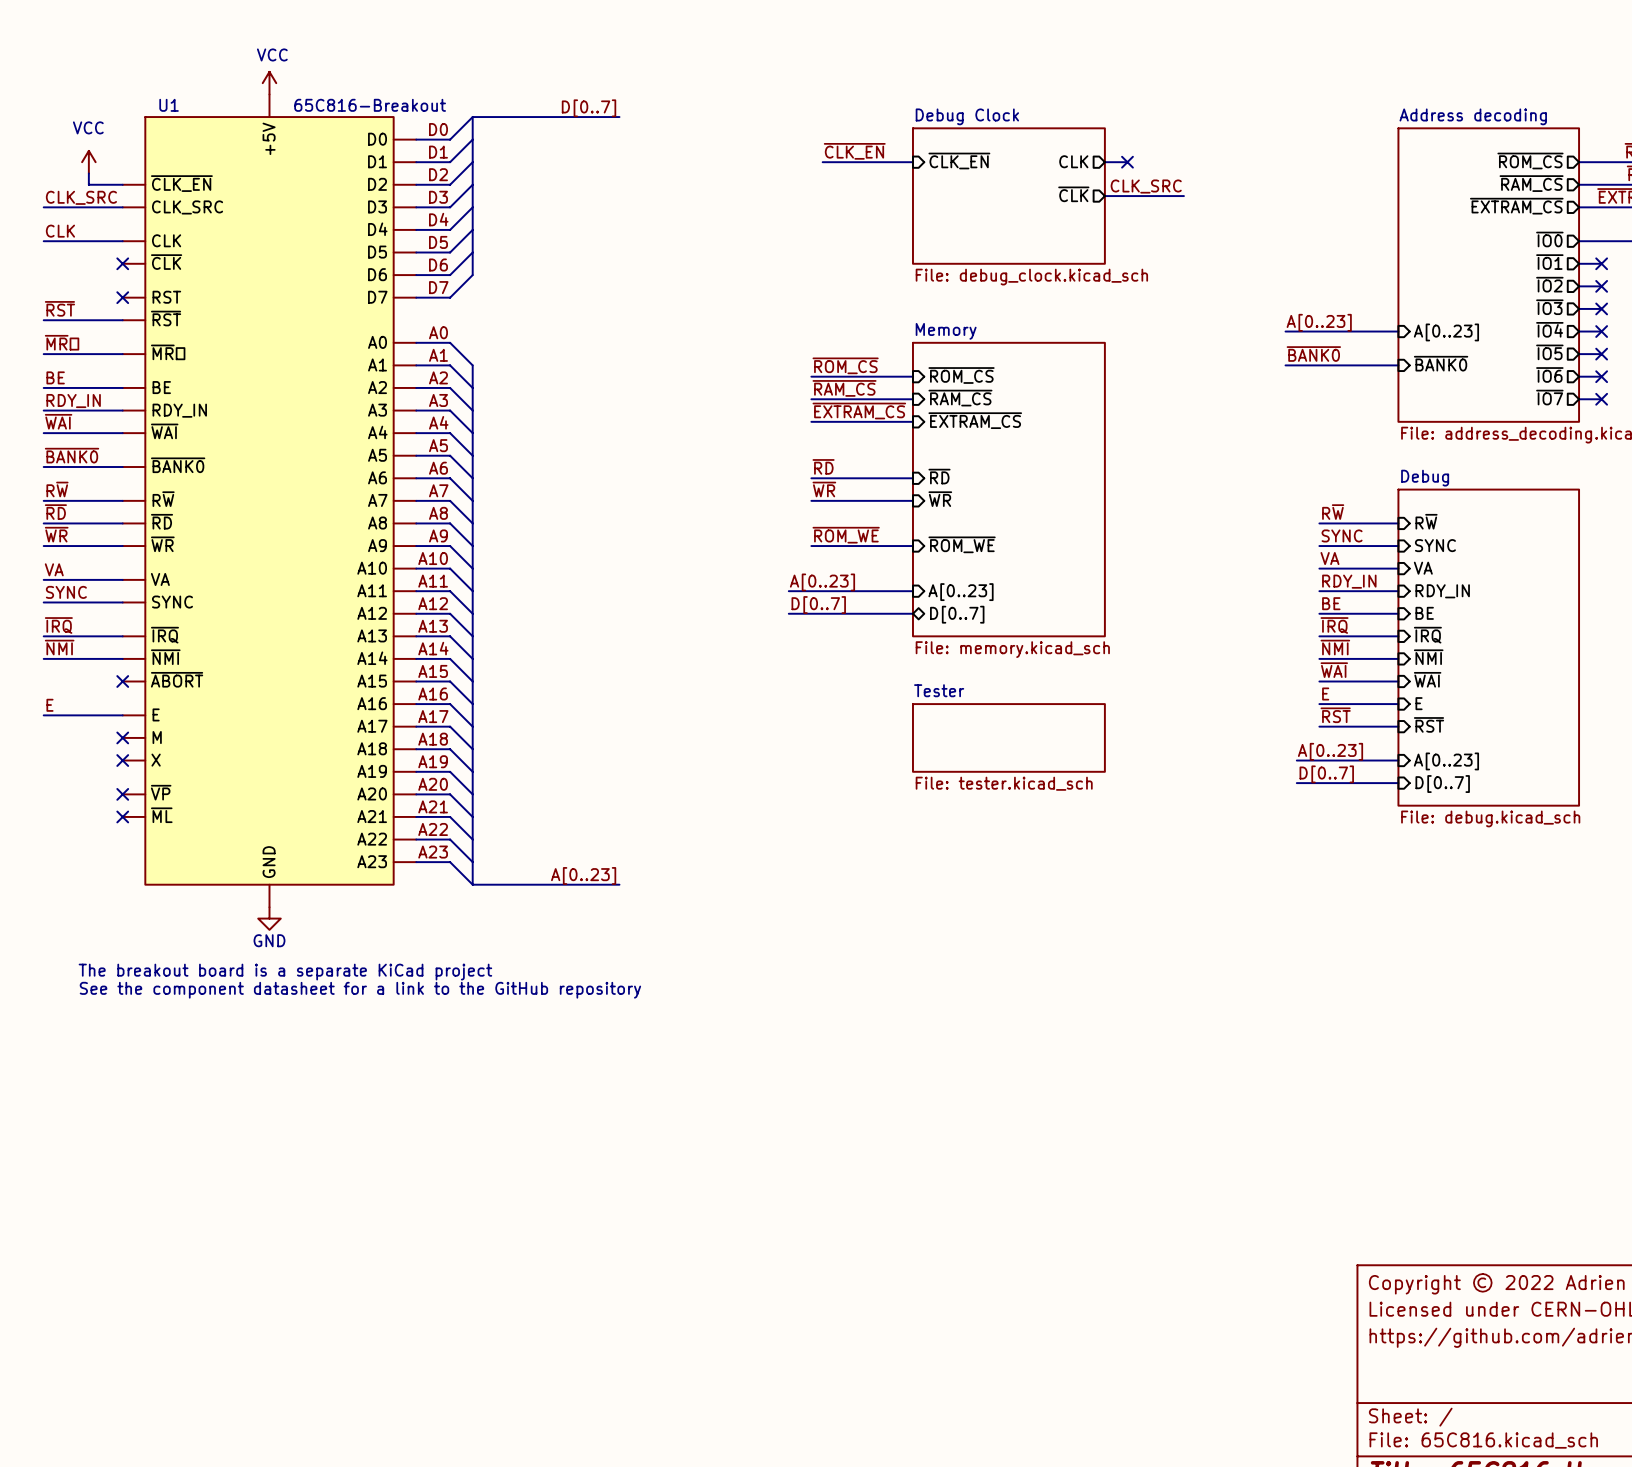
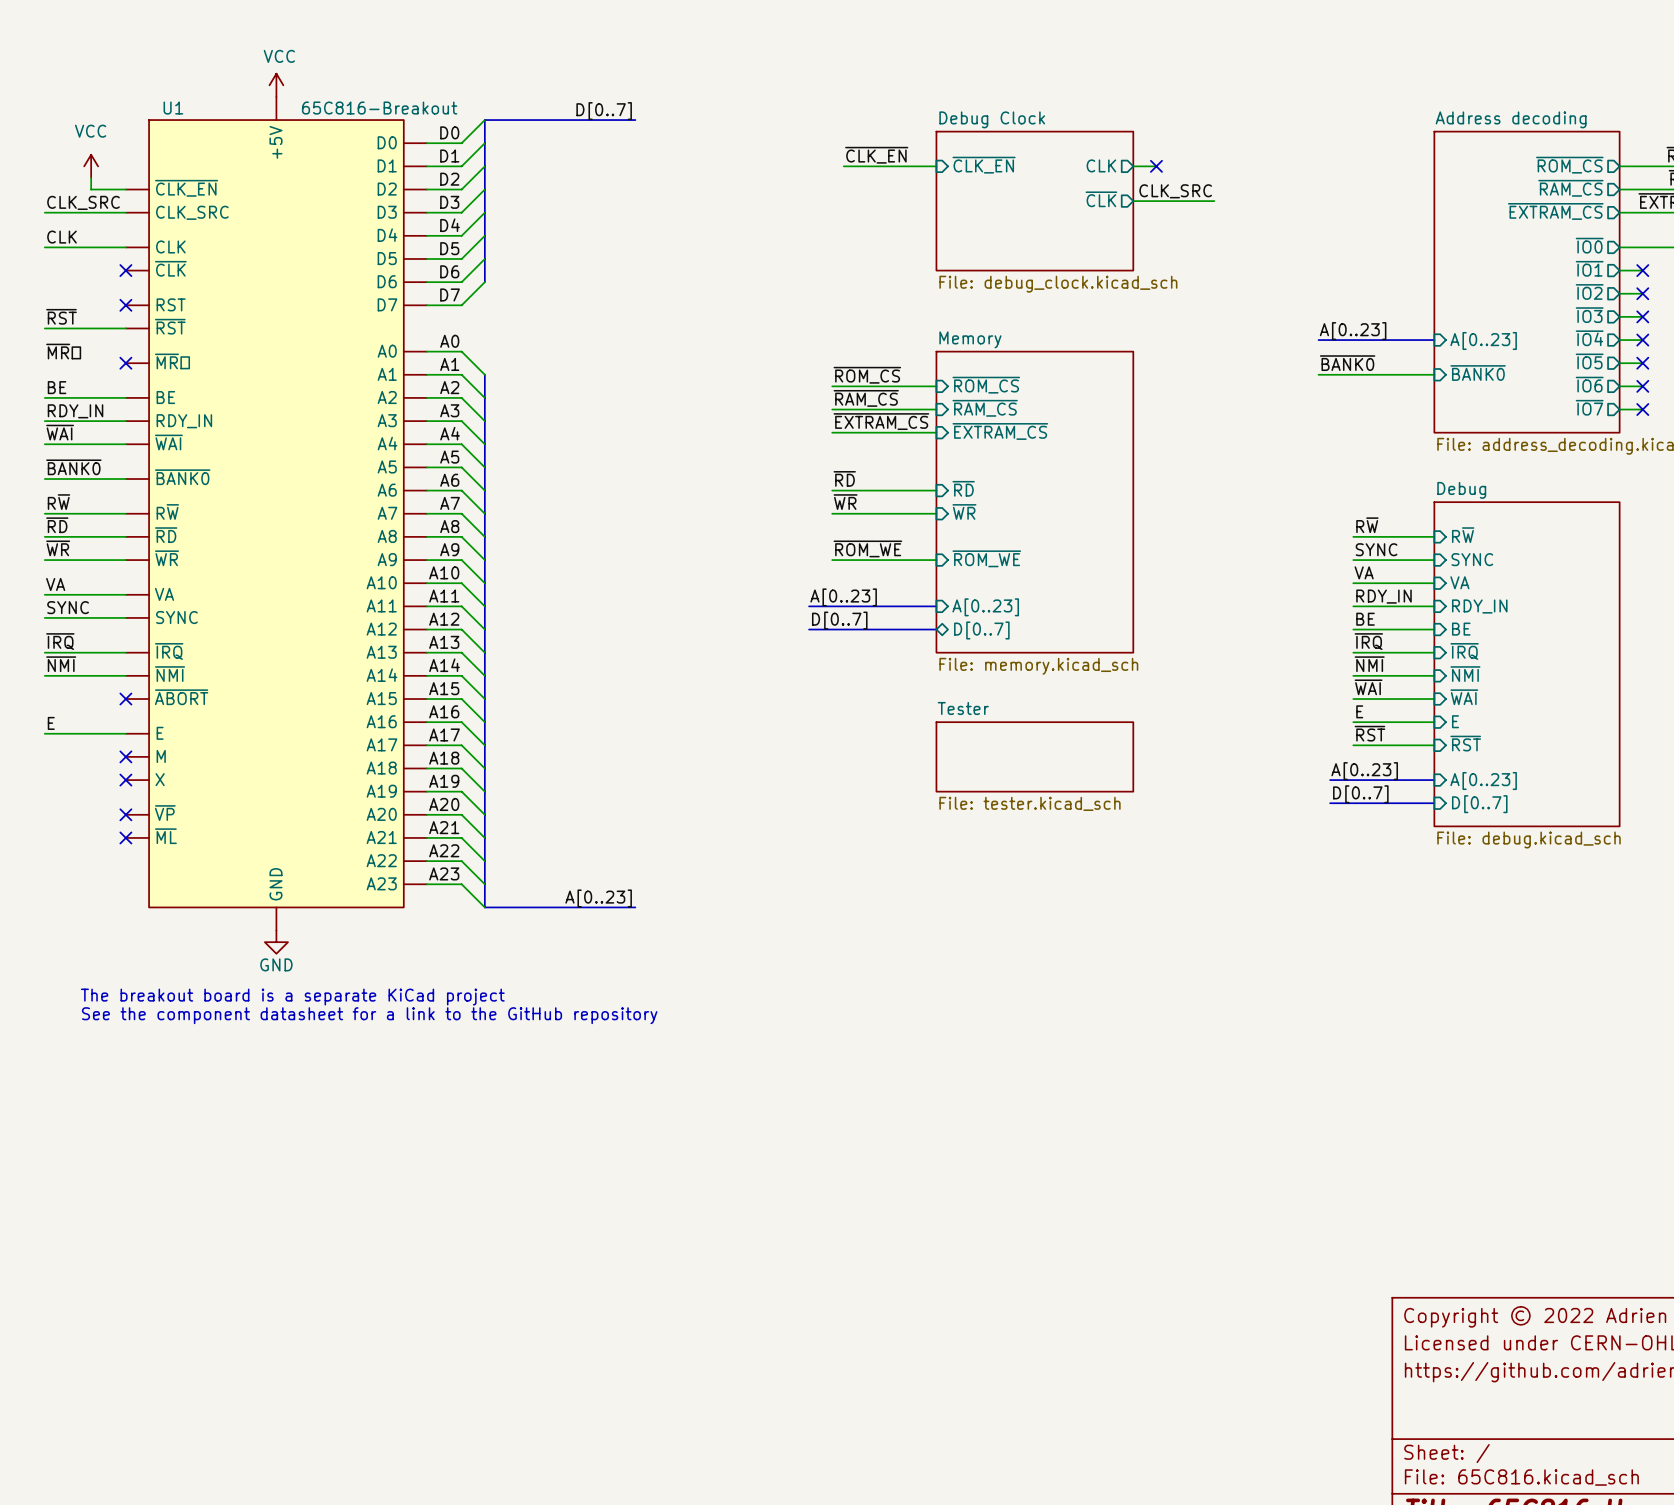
wire: (43, 354) (122, 354) -> none
no-connect mark: none -> (125, 363)

